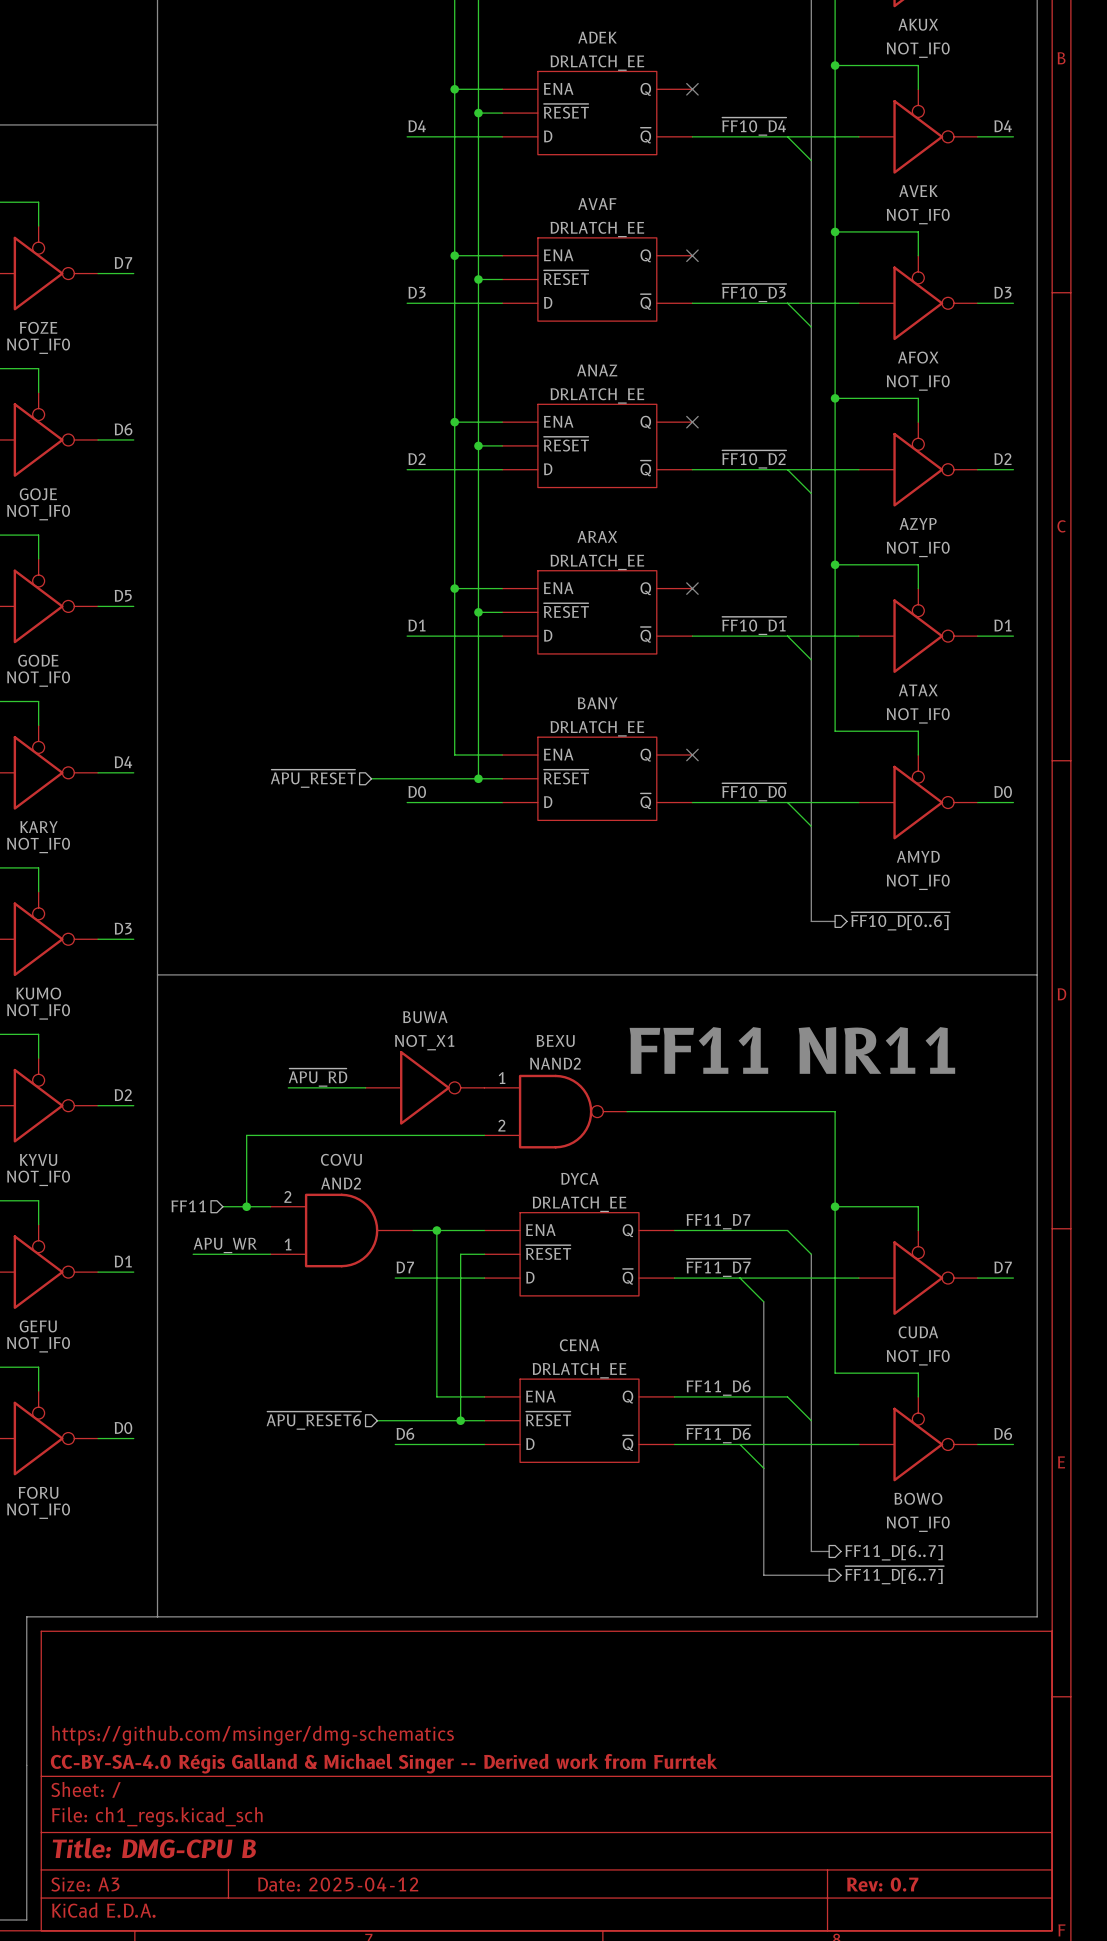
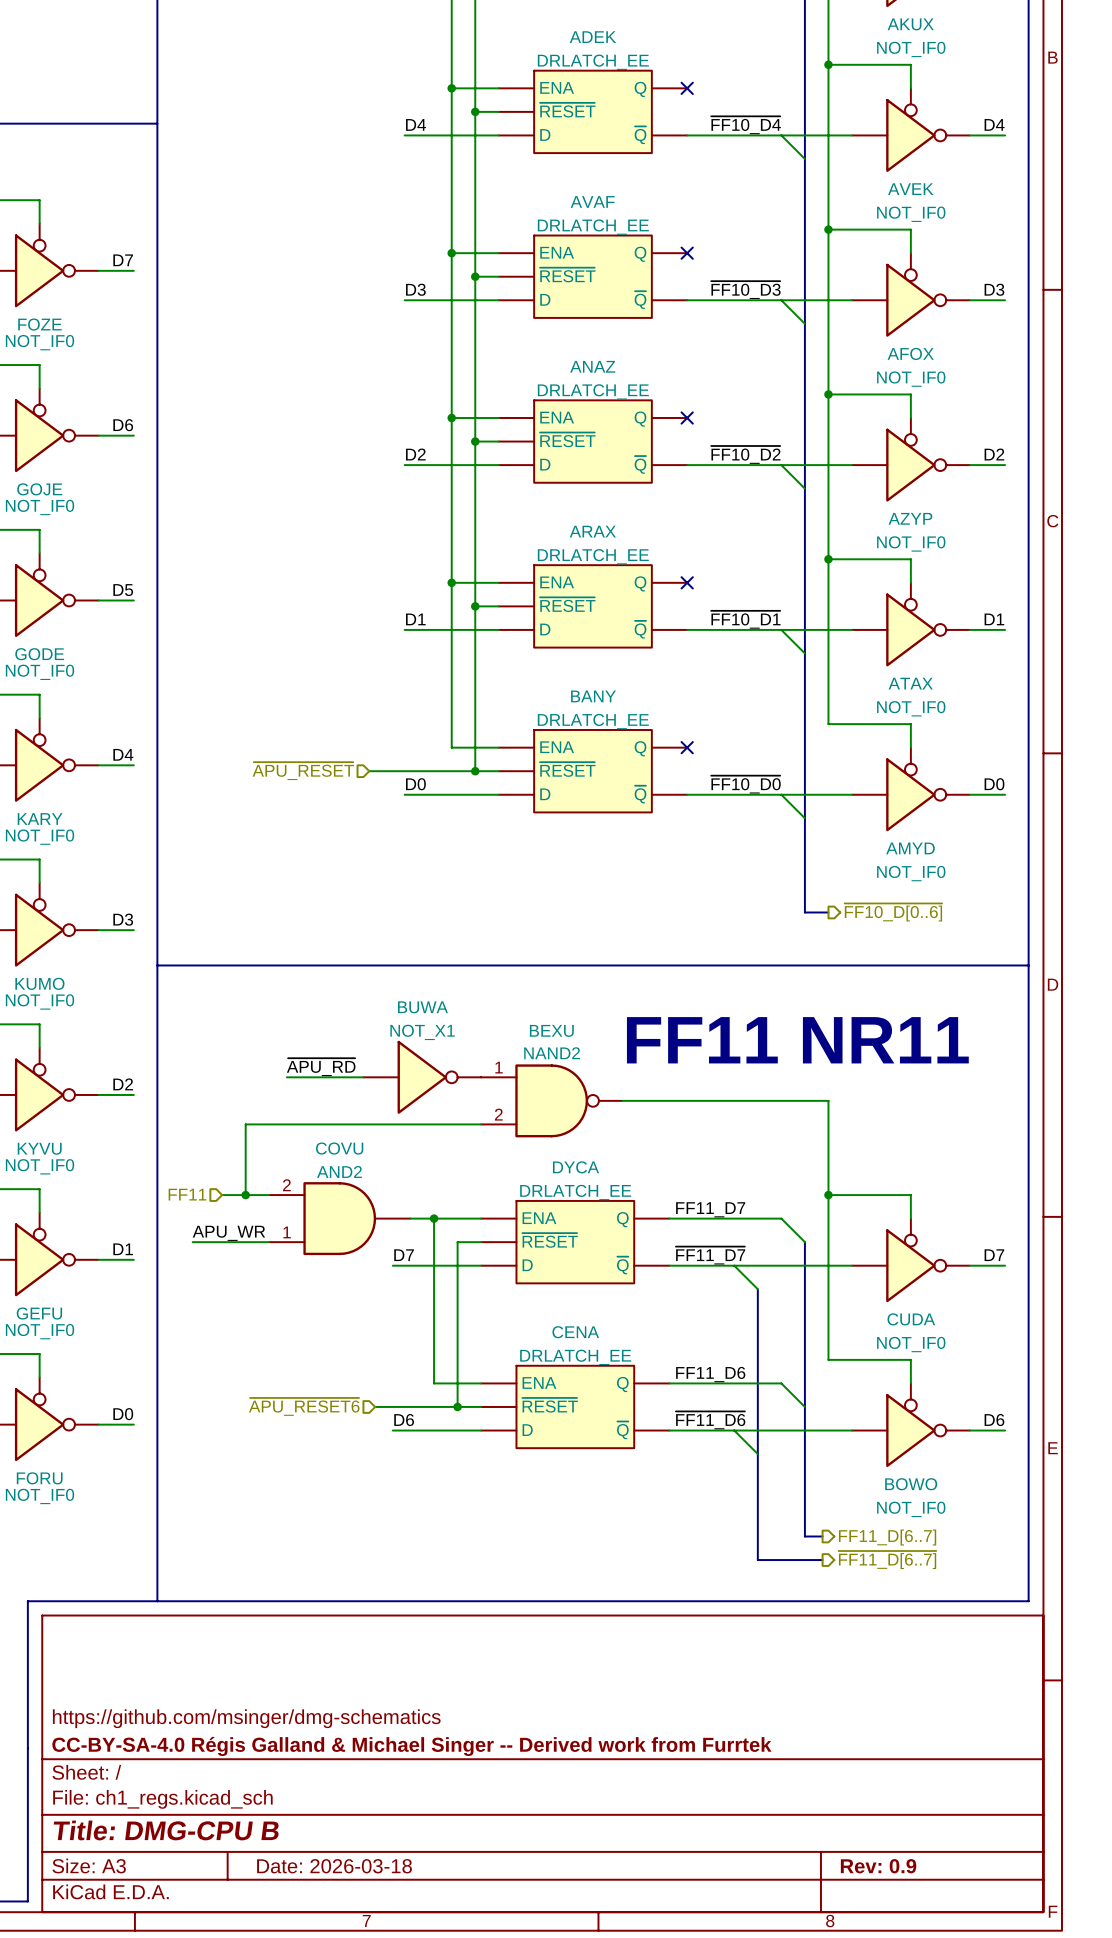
title block: Date: 2025-04-12 (338, 1884) -> Date: 2026-03-18 (334, 1866)
title block: Rev: 0.7 (882, 1884) -> Rev: 0.9 (878, 1866)

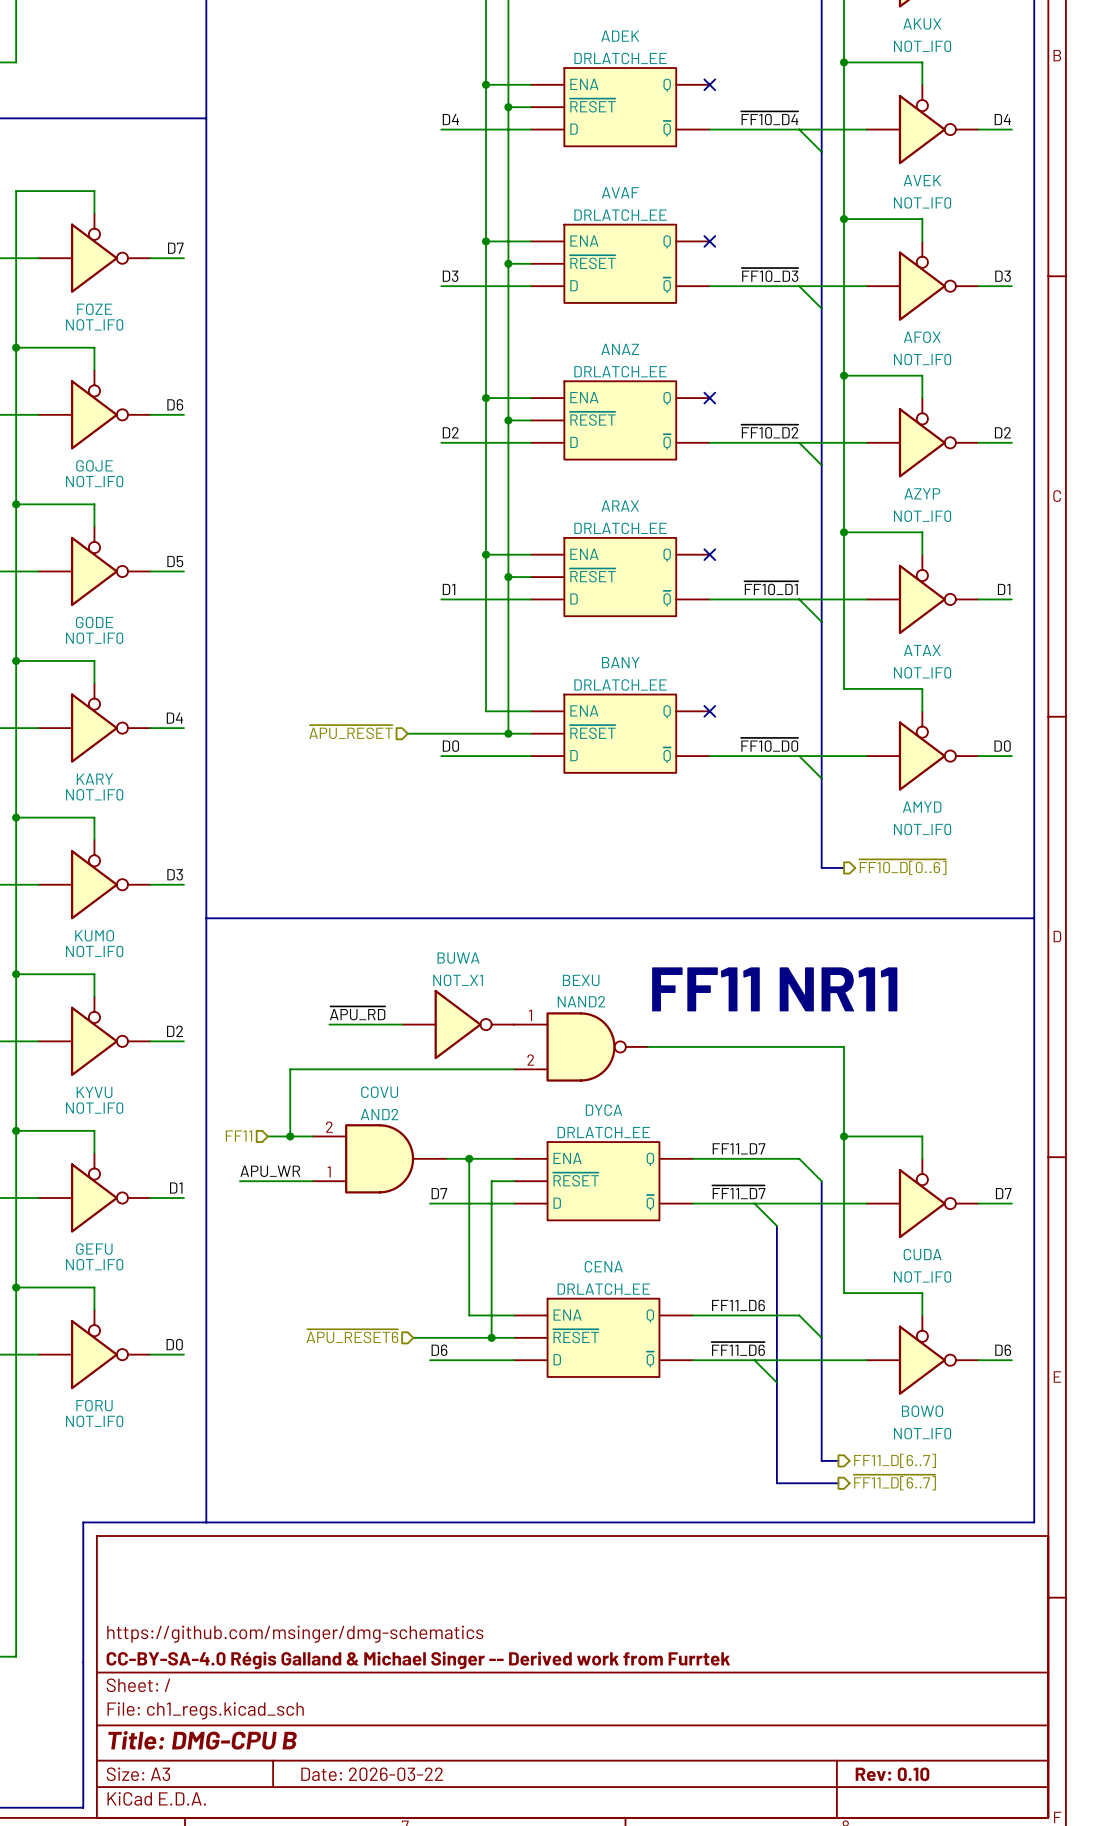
title block: Date: 2026-03-18 (334, 1866) -> Date: 2026-03-22 (372, 1774)
title block: Rev: 0.9 (878, 1866) -> Rev: 0.10 (892, 1774)

